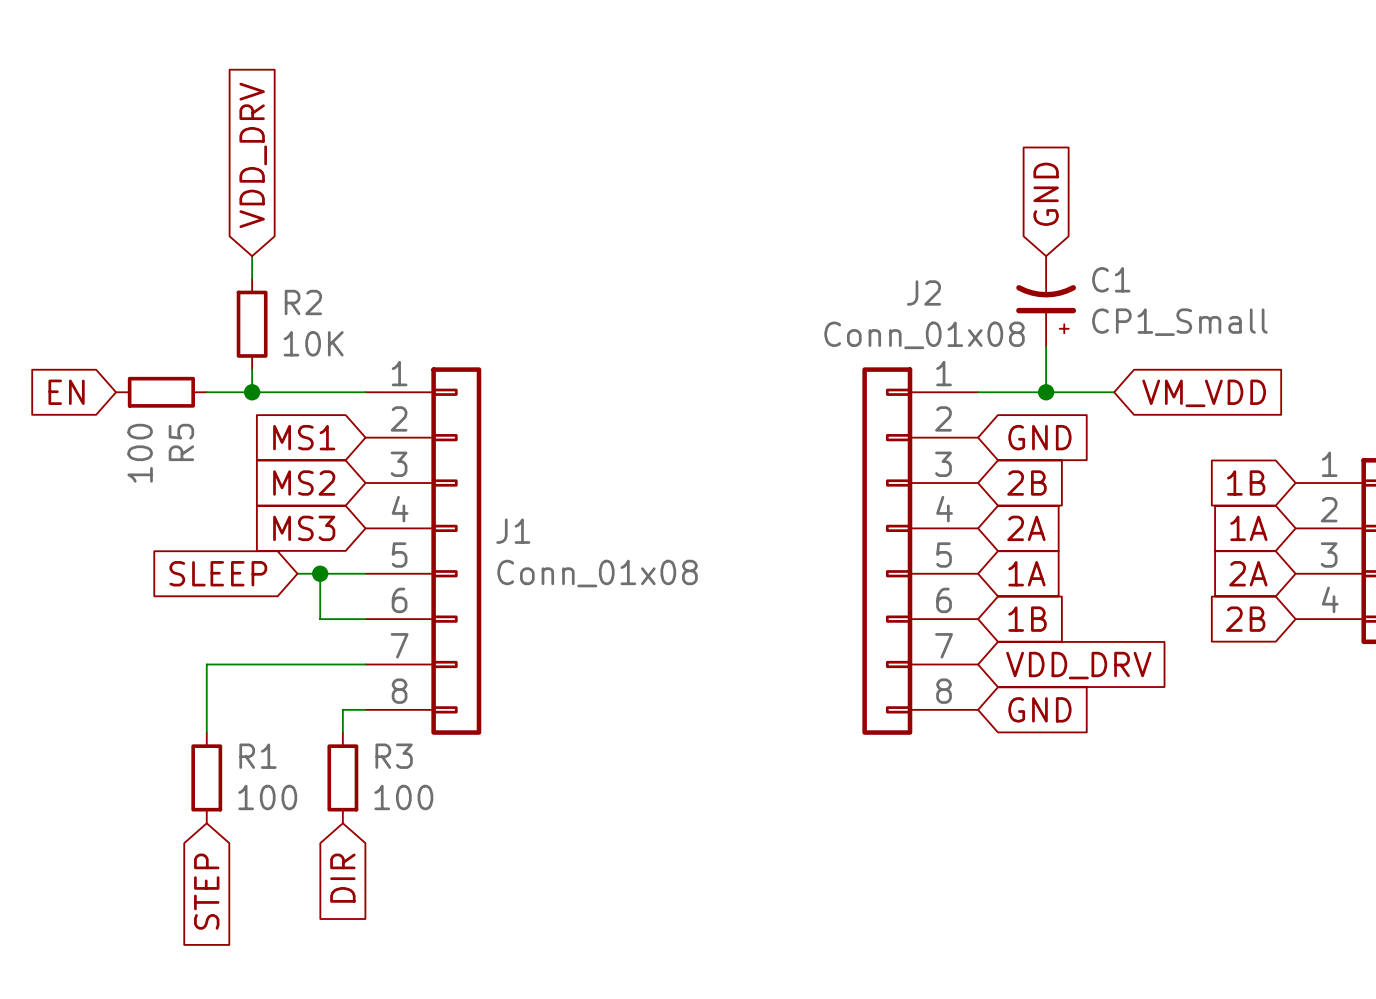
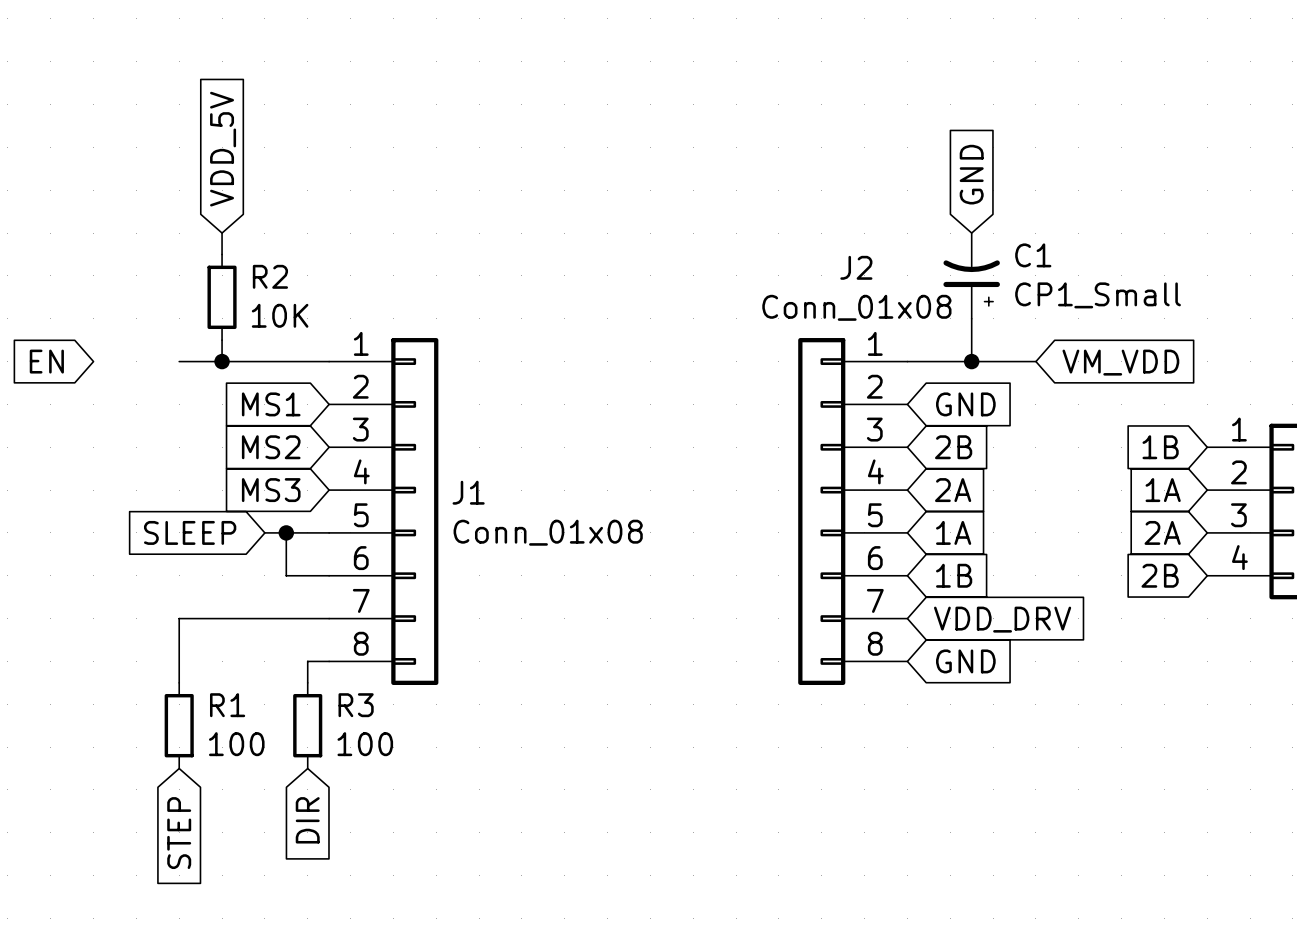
global label: VDD_DRV (253, 155) -> VDD_5V (223, 149)
R5: 100 (161, 392) -> none

